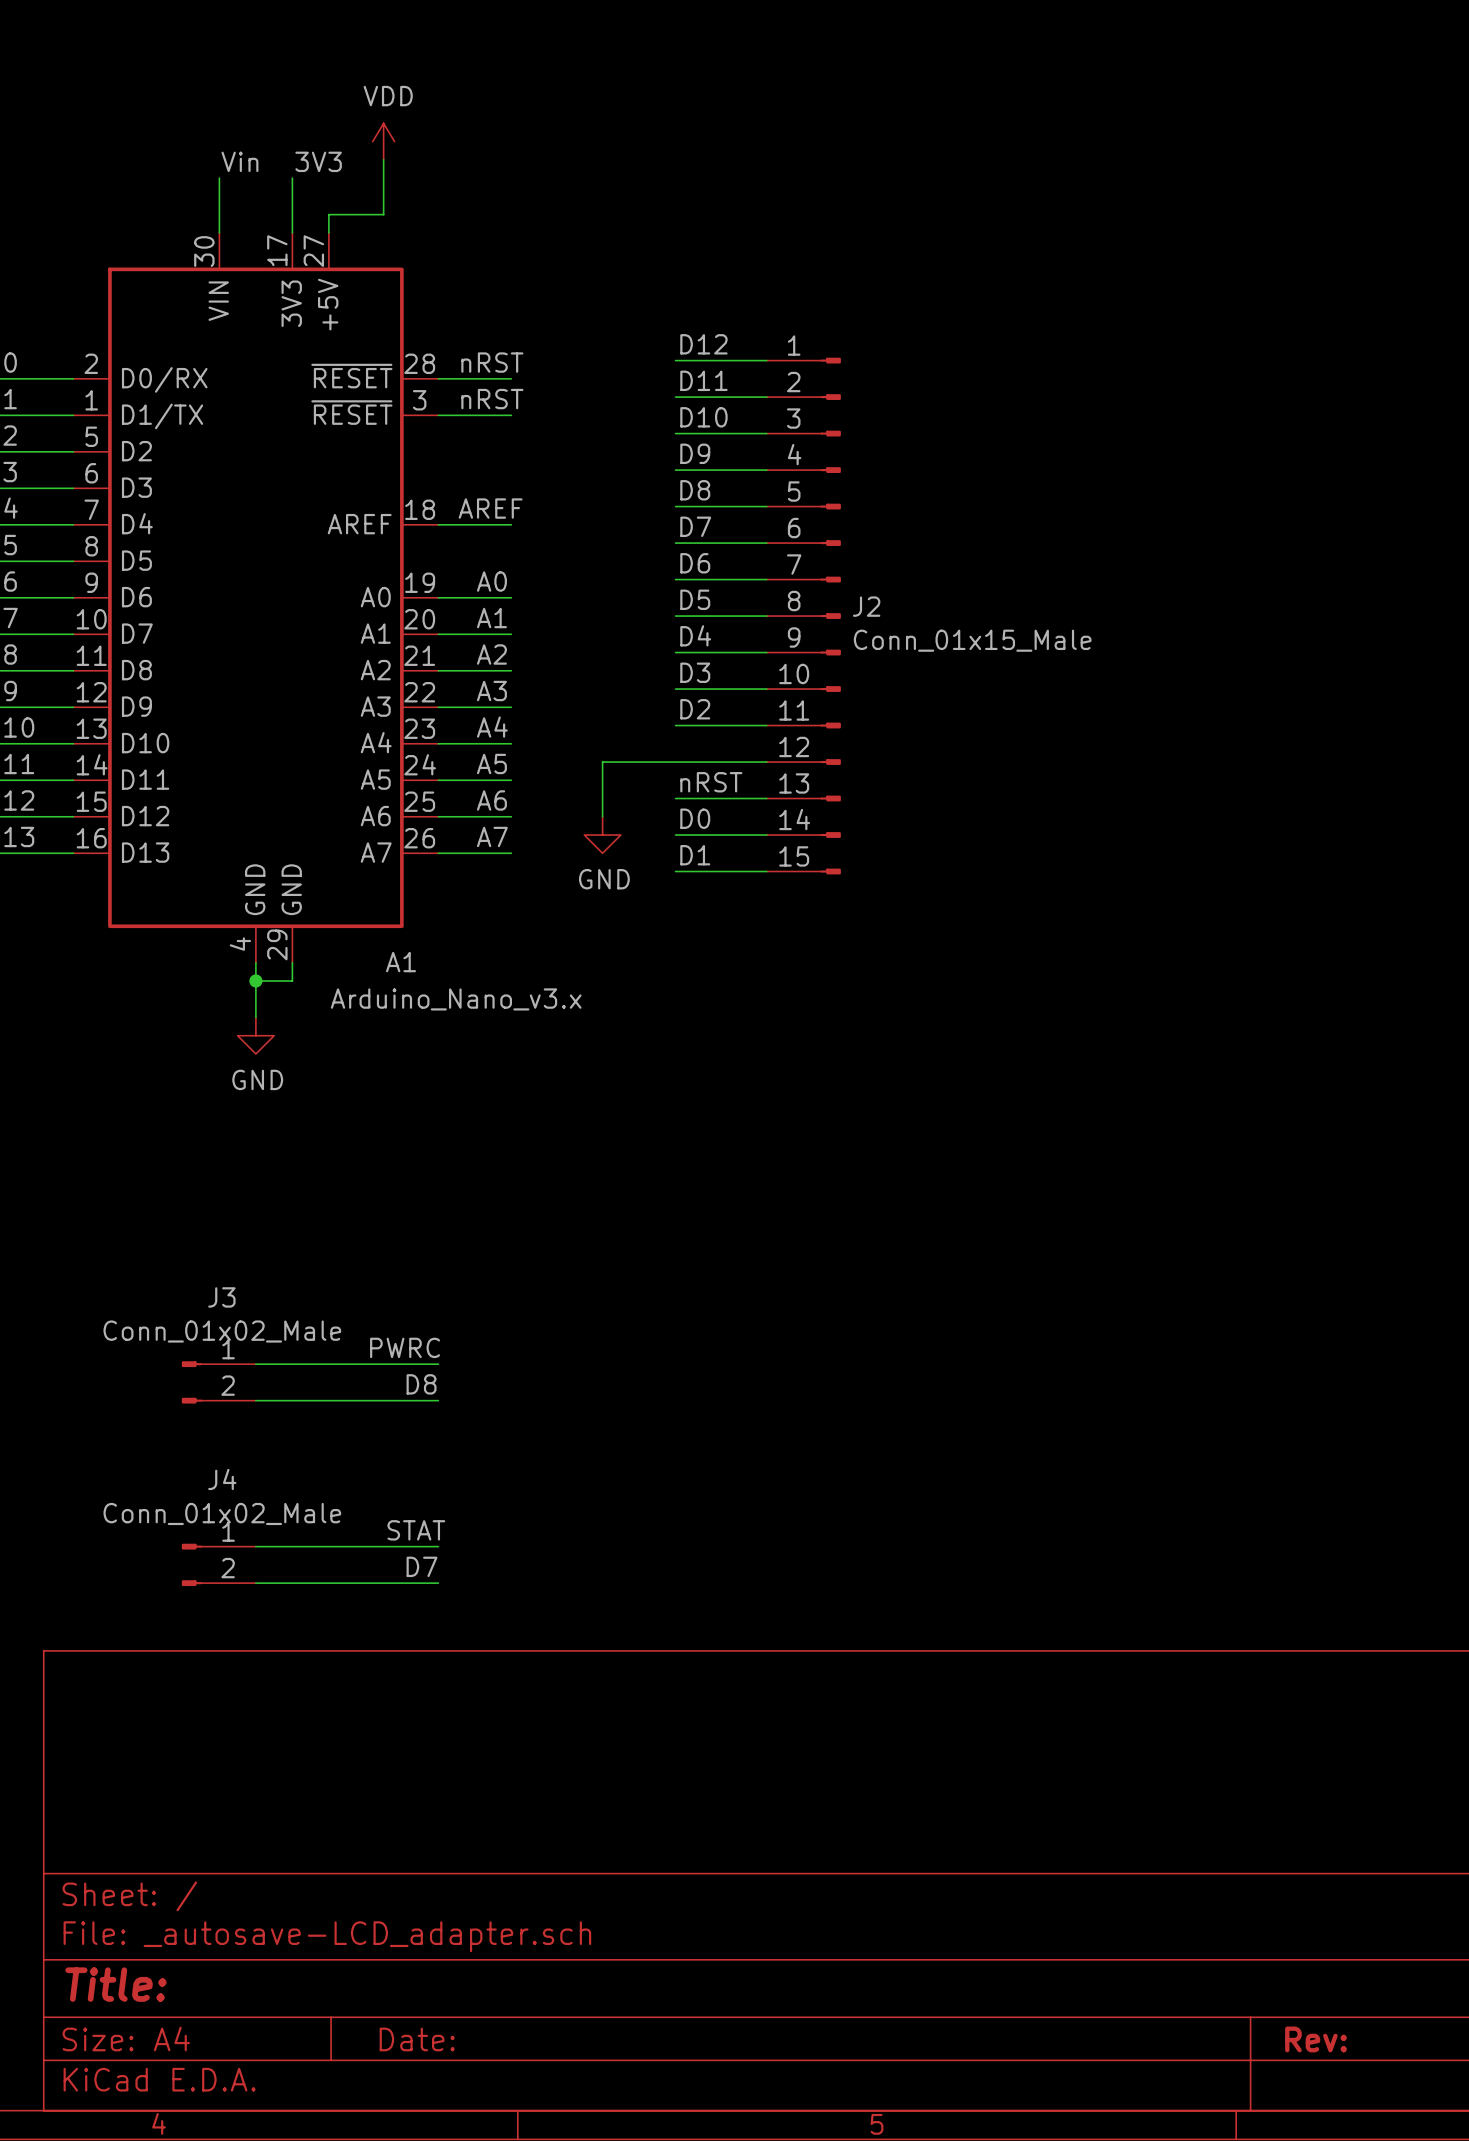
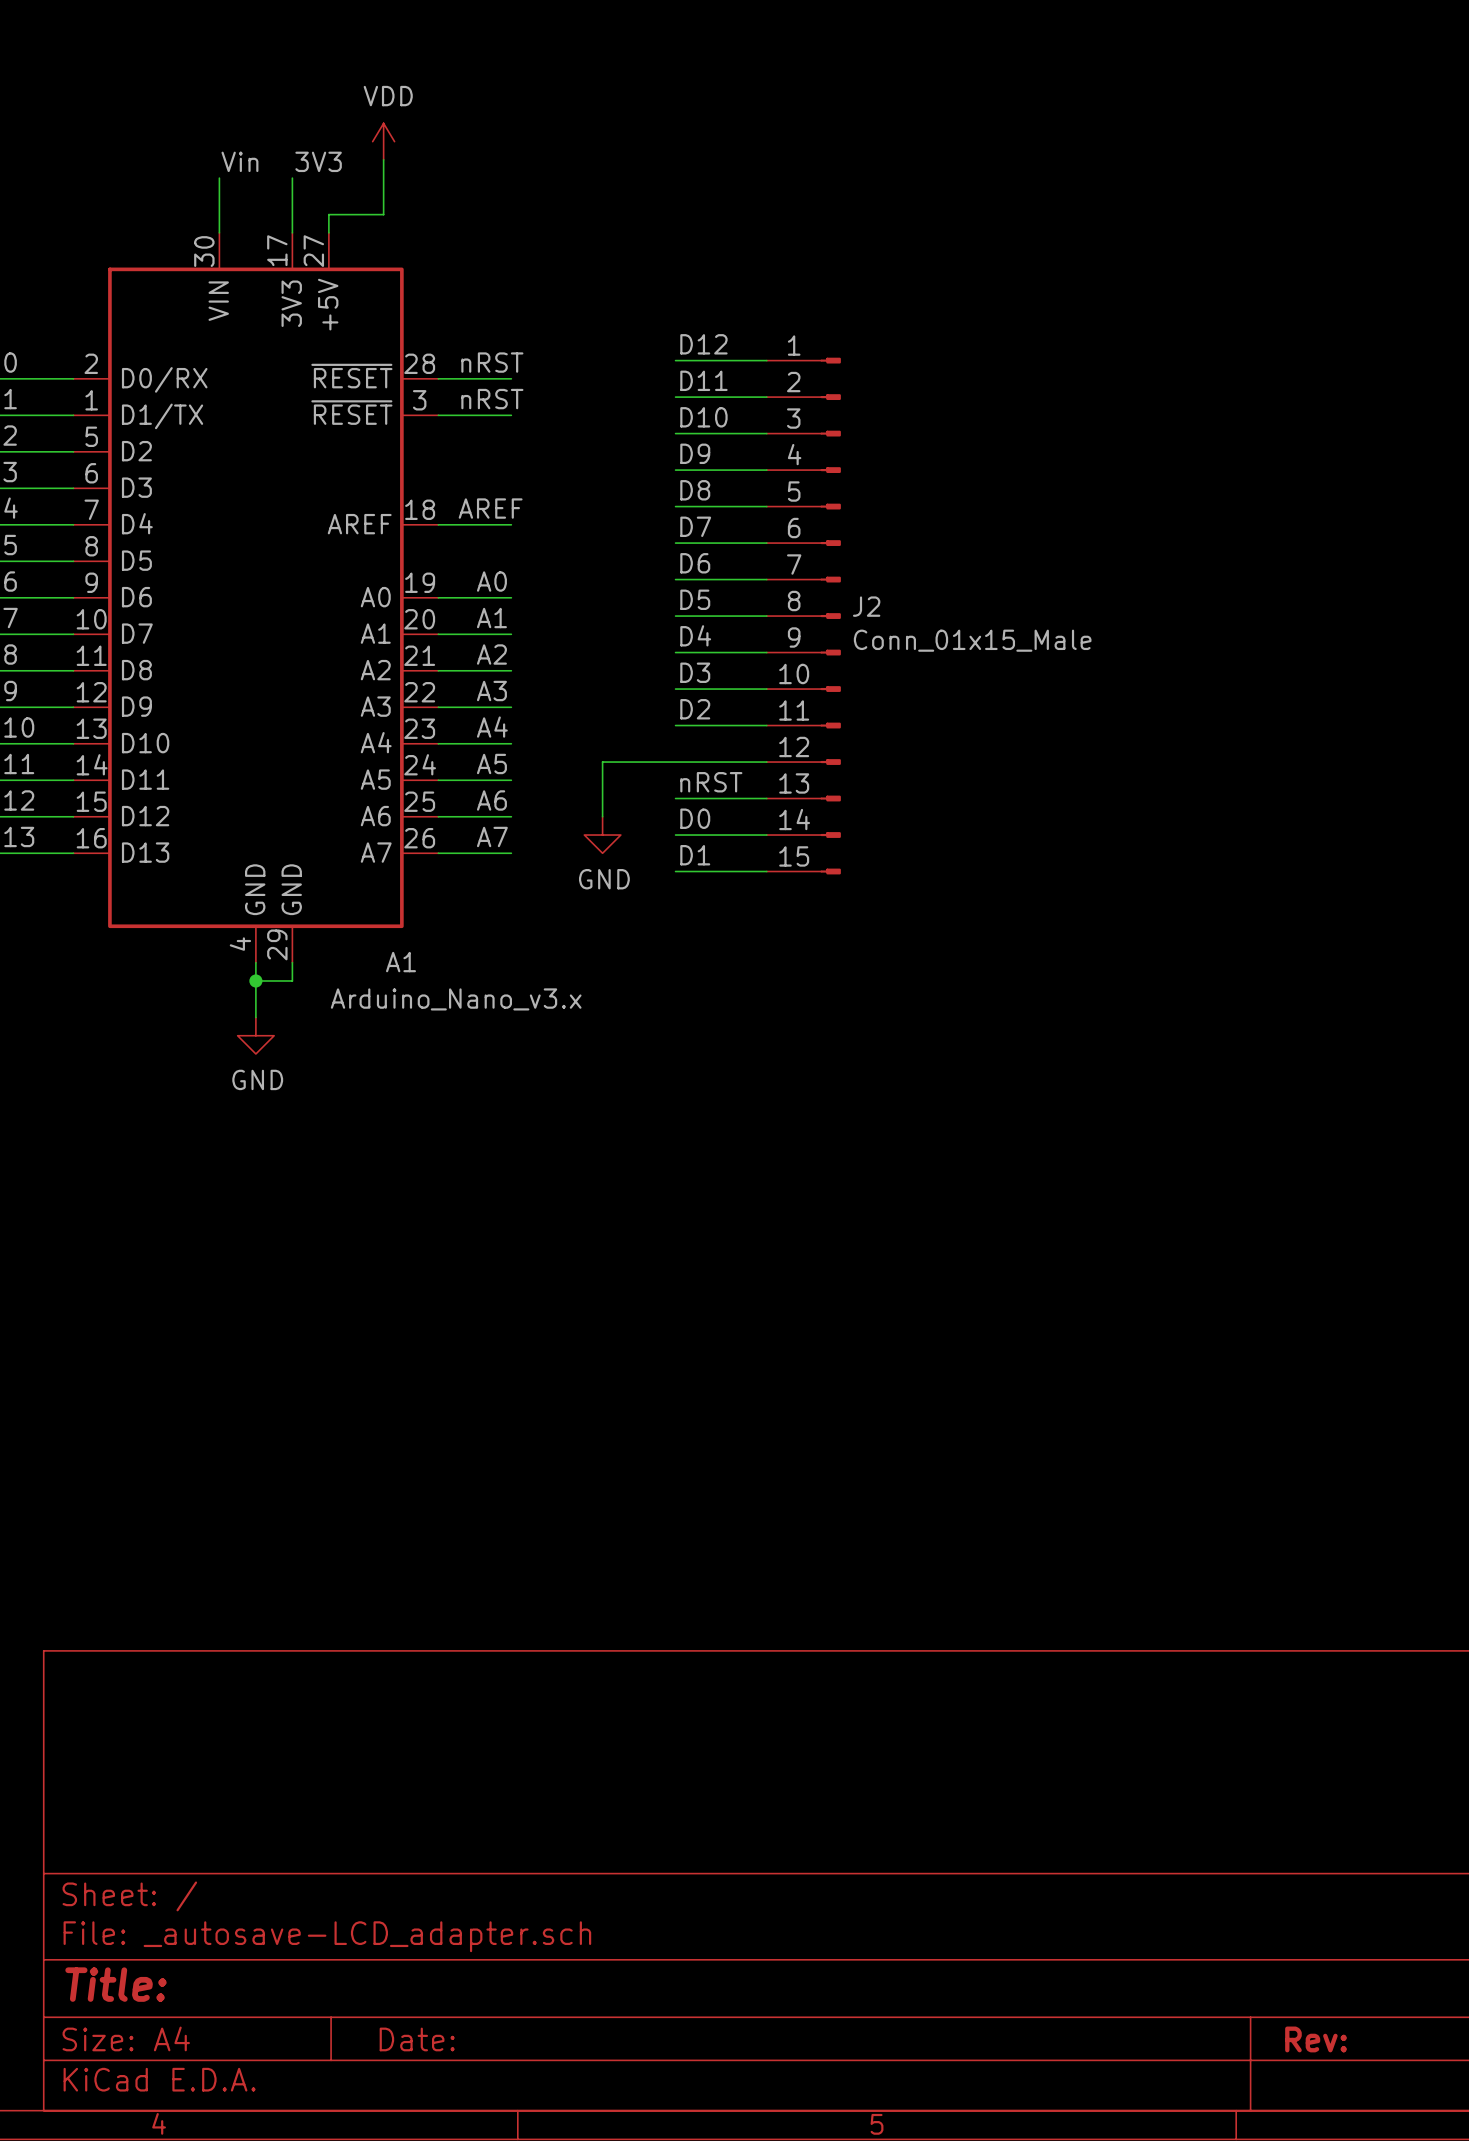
label: PWRC (405, 1347) -> none
wire: (255, 1364) (438, 1364) -> none
J3: Conn_01x02_Male (218, 1382) -> none
label: D8 (421, 1384) -> none
wire: (255, 1400) (438, 1400) -> none
label: STAT (416, 1530) -> none
wire: (255, 1546) (438, 1546) -> none
J4: Conn_01x02_Male (218, 1564) -> none
label: D7 (421, 1566) -> none
wire: (255, 1583) (438, 1583) -> none

